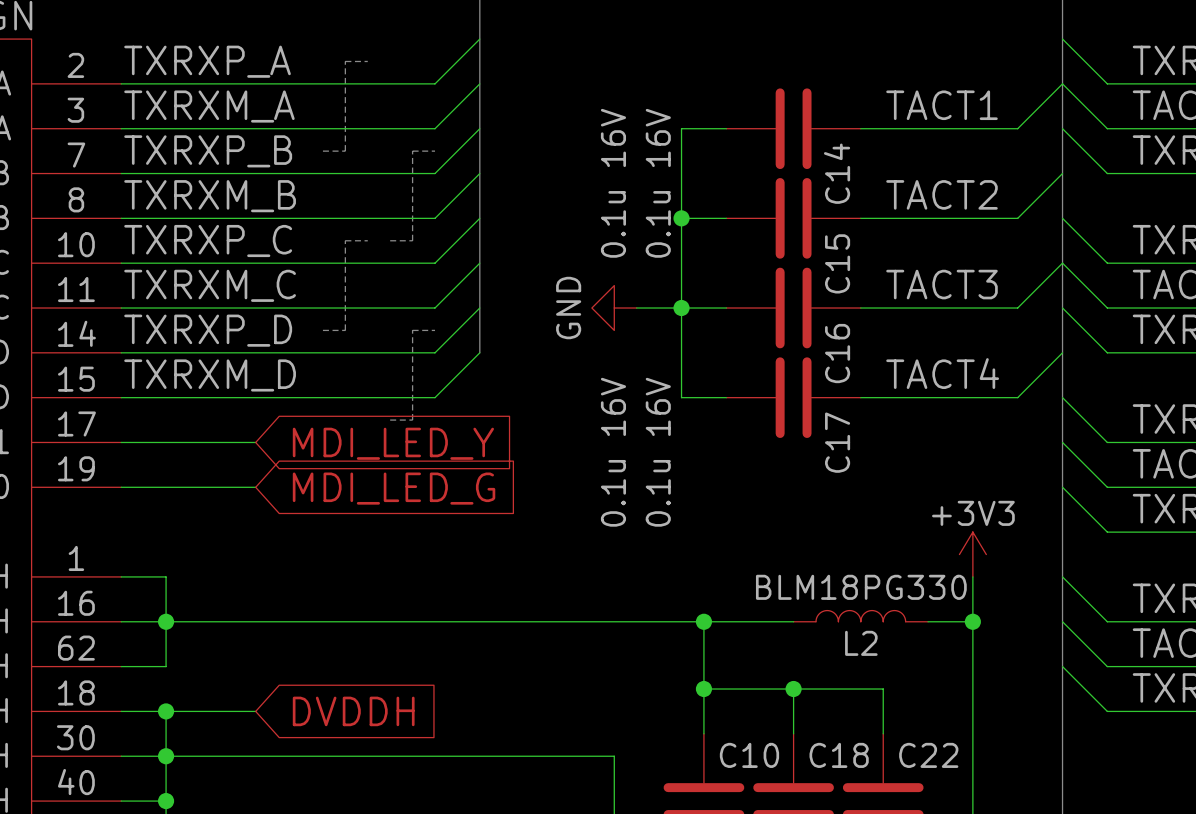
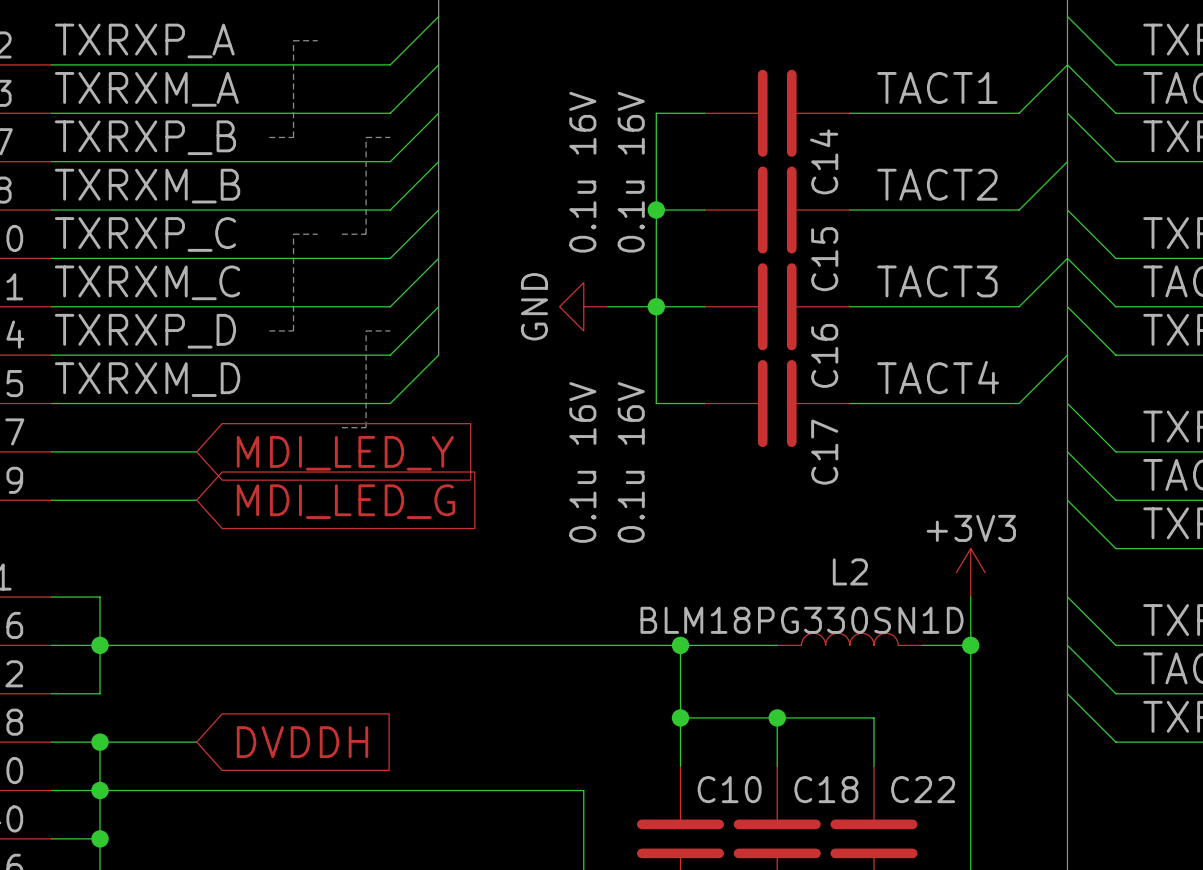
L2 value: BLM18PG330 (861, 587) -> BLM18PG330SN1D (802, 620)
L2 name position: L2 (861, 643) -> L2 (850, 571)

